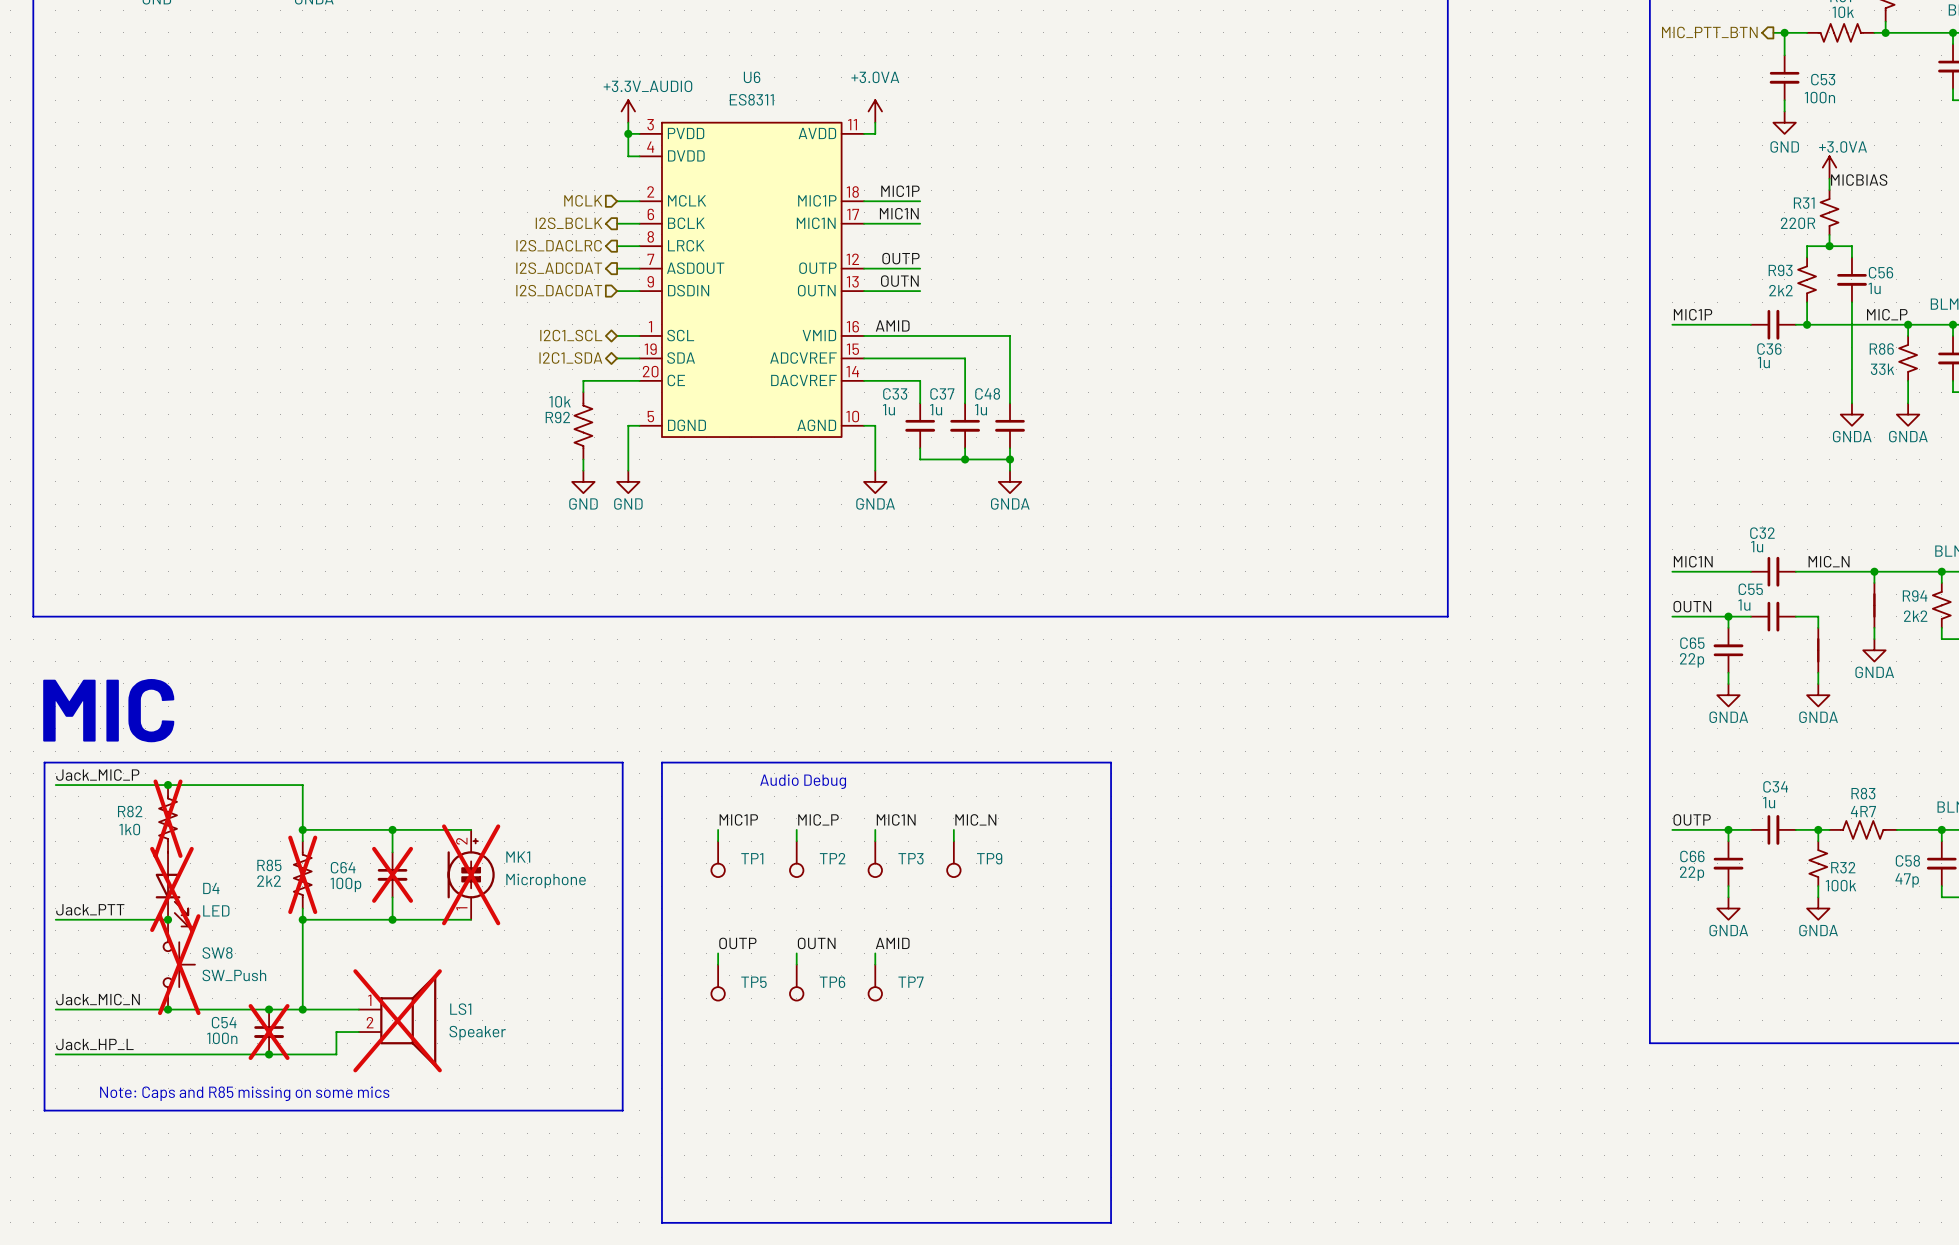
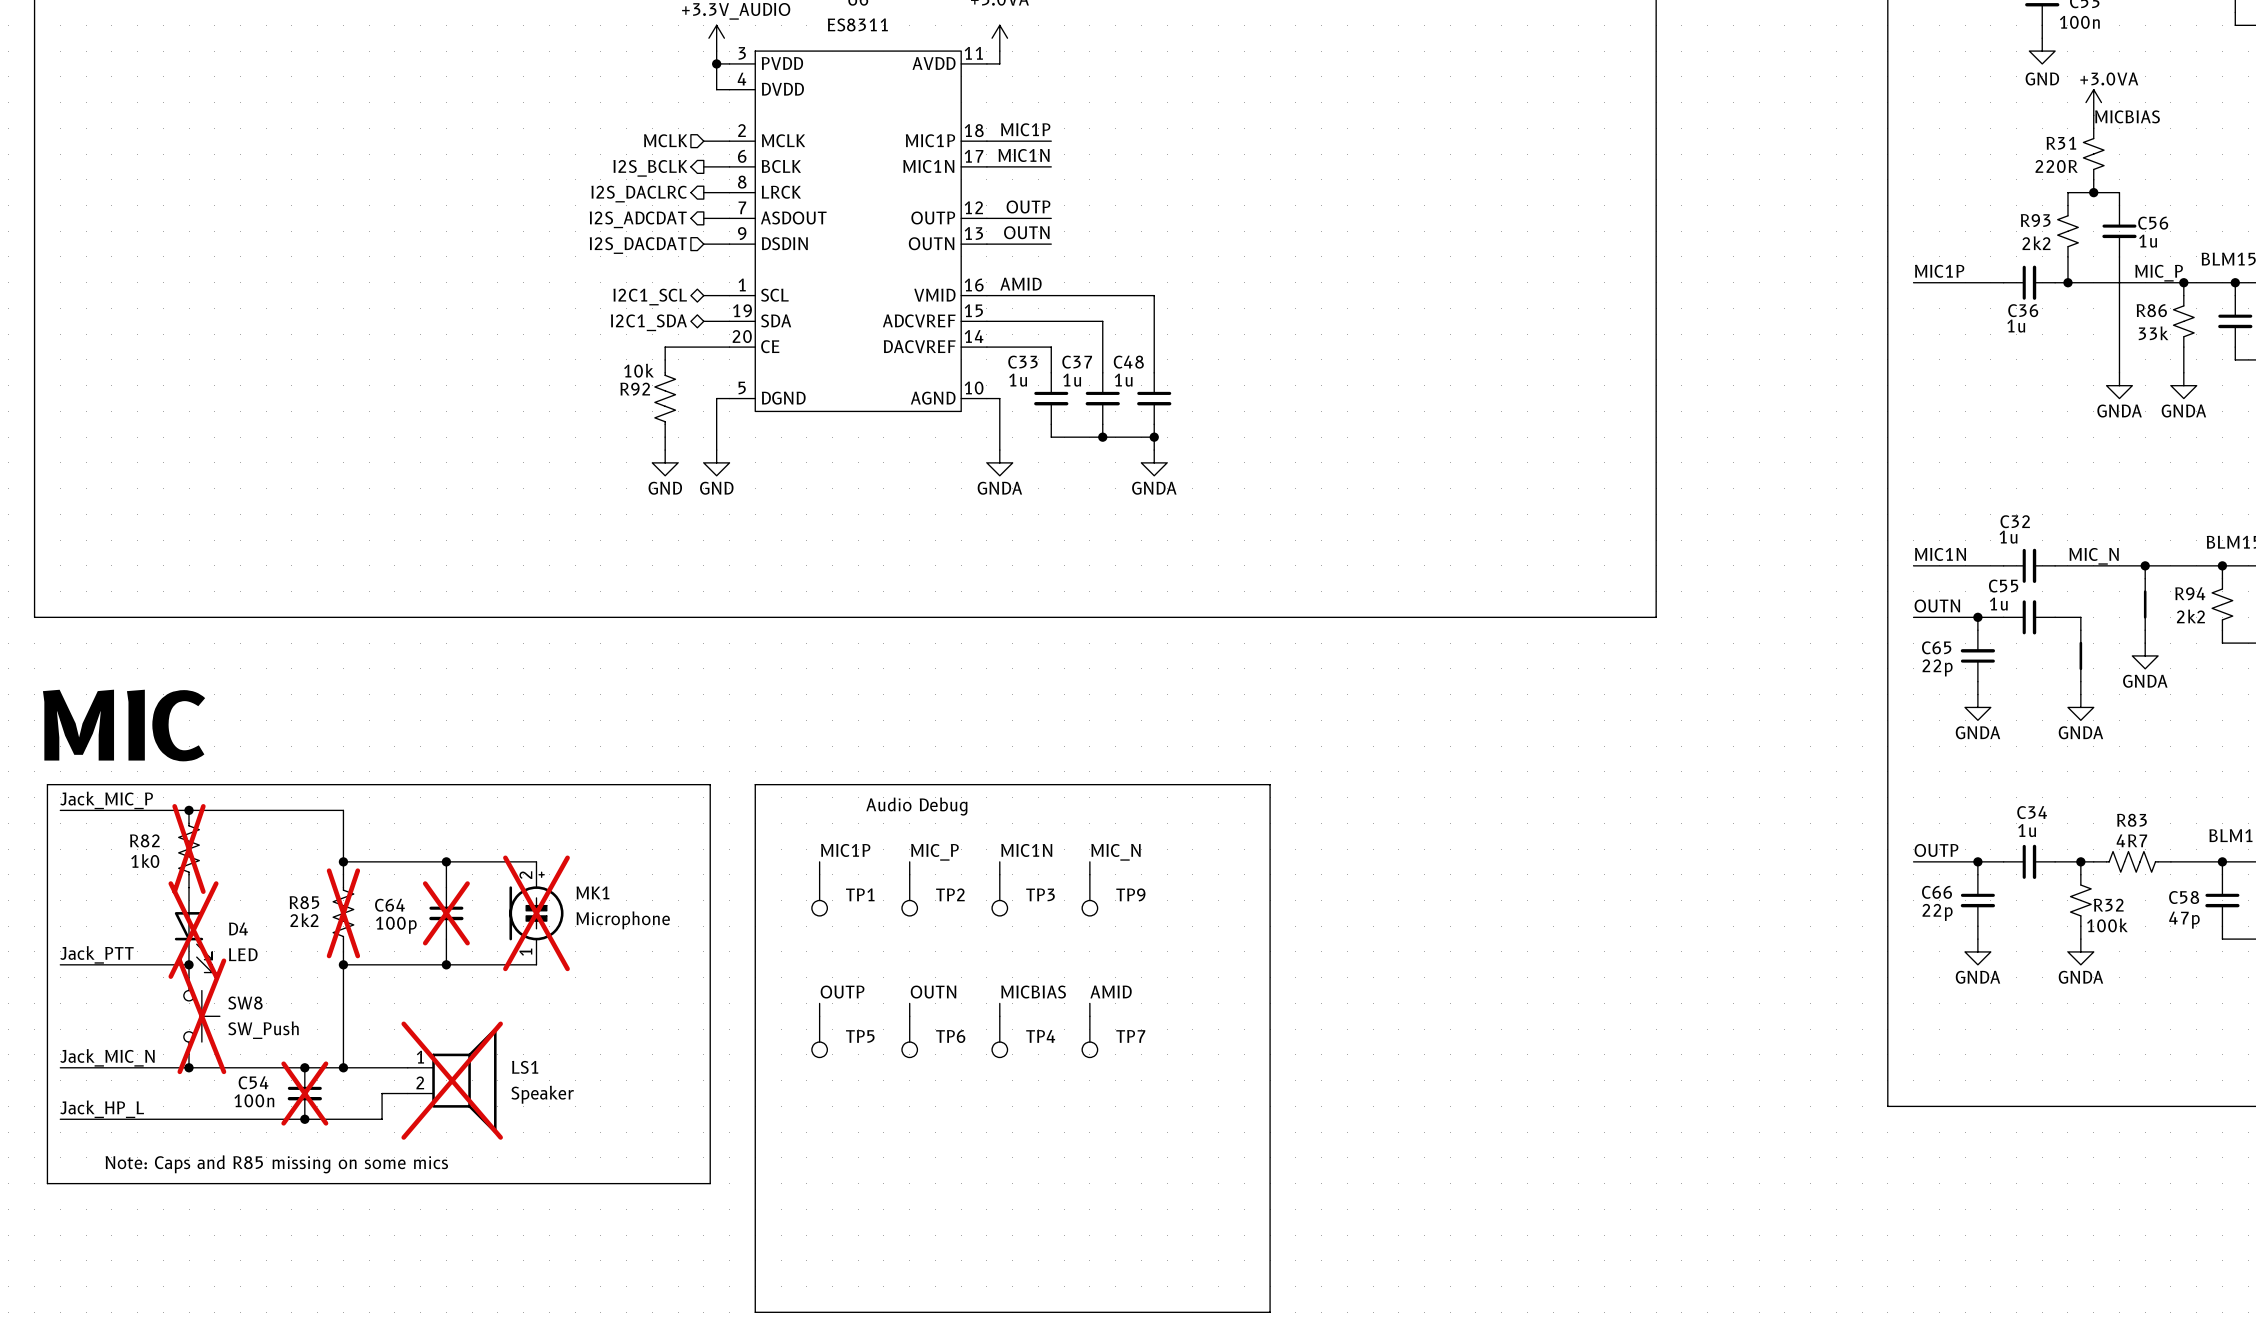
label: AMID (892, 943) -> MICBIAS (1033, 992)
label: none -> AMID (1111, 991)
wire: none -> (1089, 1003) (1089, 1016)
TP7 name: TP7 (911, 982) -> TP4 (1040, 1036)
TP7: none -> (1089, 1036)

